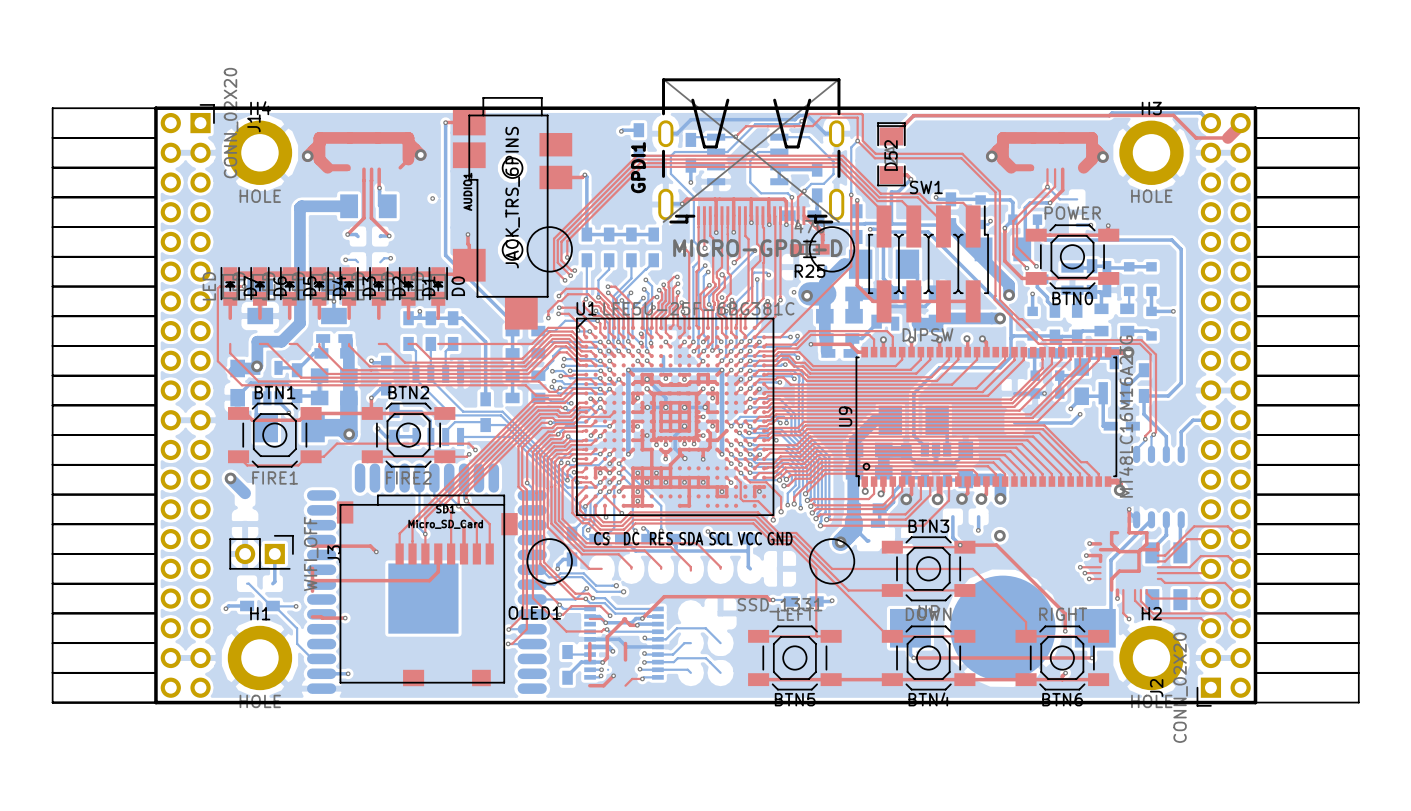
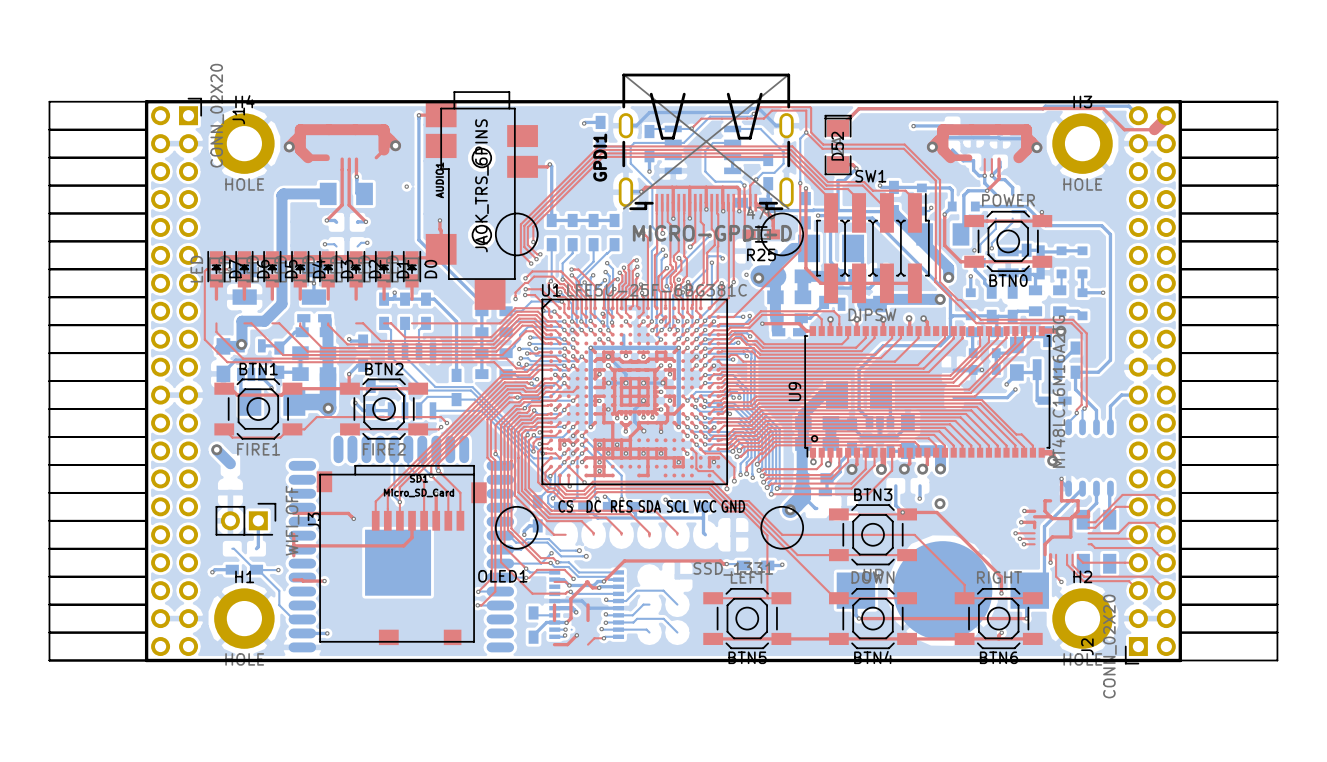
bottom track: none -> (952, 125) (913, 126)
via: none -> (913, 126)
bottom track: none -> (932, 147) (941, 137) (999, 137) (1028, 138) (1036, 147)
bottom track: none -> (952, 151) (952, 150) (963, 160) (973, 160) (973, 170) (979, 175) (984, 175) (984, 183) (995, 194)
bottom track: none -> (1000, 161) (1000, 167) (991, 175) (995, 179) (1004, 179) (1012, 187) (1012, 194)
bottom track: (1047, 186) (1059, 199) (1077, 199) -> none
top track: (1047, 186) (1013, 221) (1013, 254) (1026, 268) -> none
top track: (1055, 186) (1017, 224) (1017, 246) (1036, 266) -> none
via: none -> (991, 175)
bottom track: (1037, 219) (1037, 231) (1045, 240) (1112, 240) -> (975, 206) (1026, 206) (1045, 225)
via: (1090, 225) -> none
bottom track: none -> (995, 218) (995, 228) (980, 244) (980, 252)
bottom track: none -> (1012, 218) (1012, 222) (991, 243) (991, 248)
via: none -> (991, 248)
via: (1026, 268) -> none

